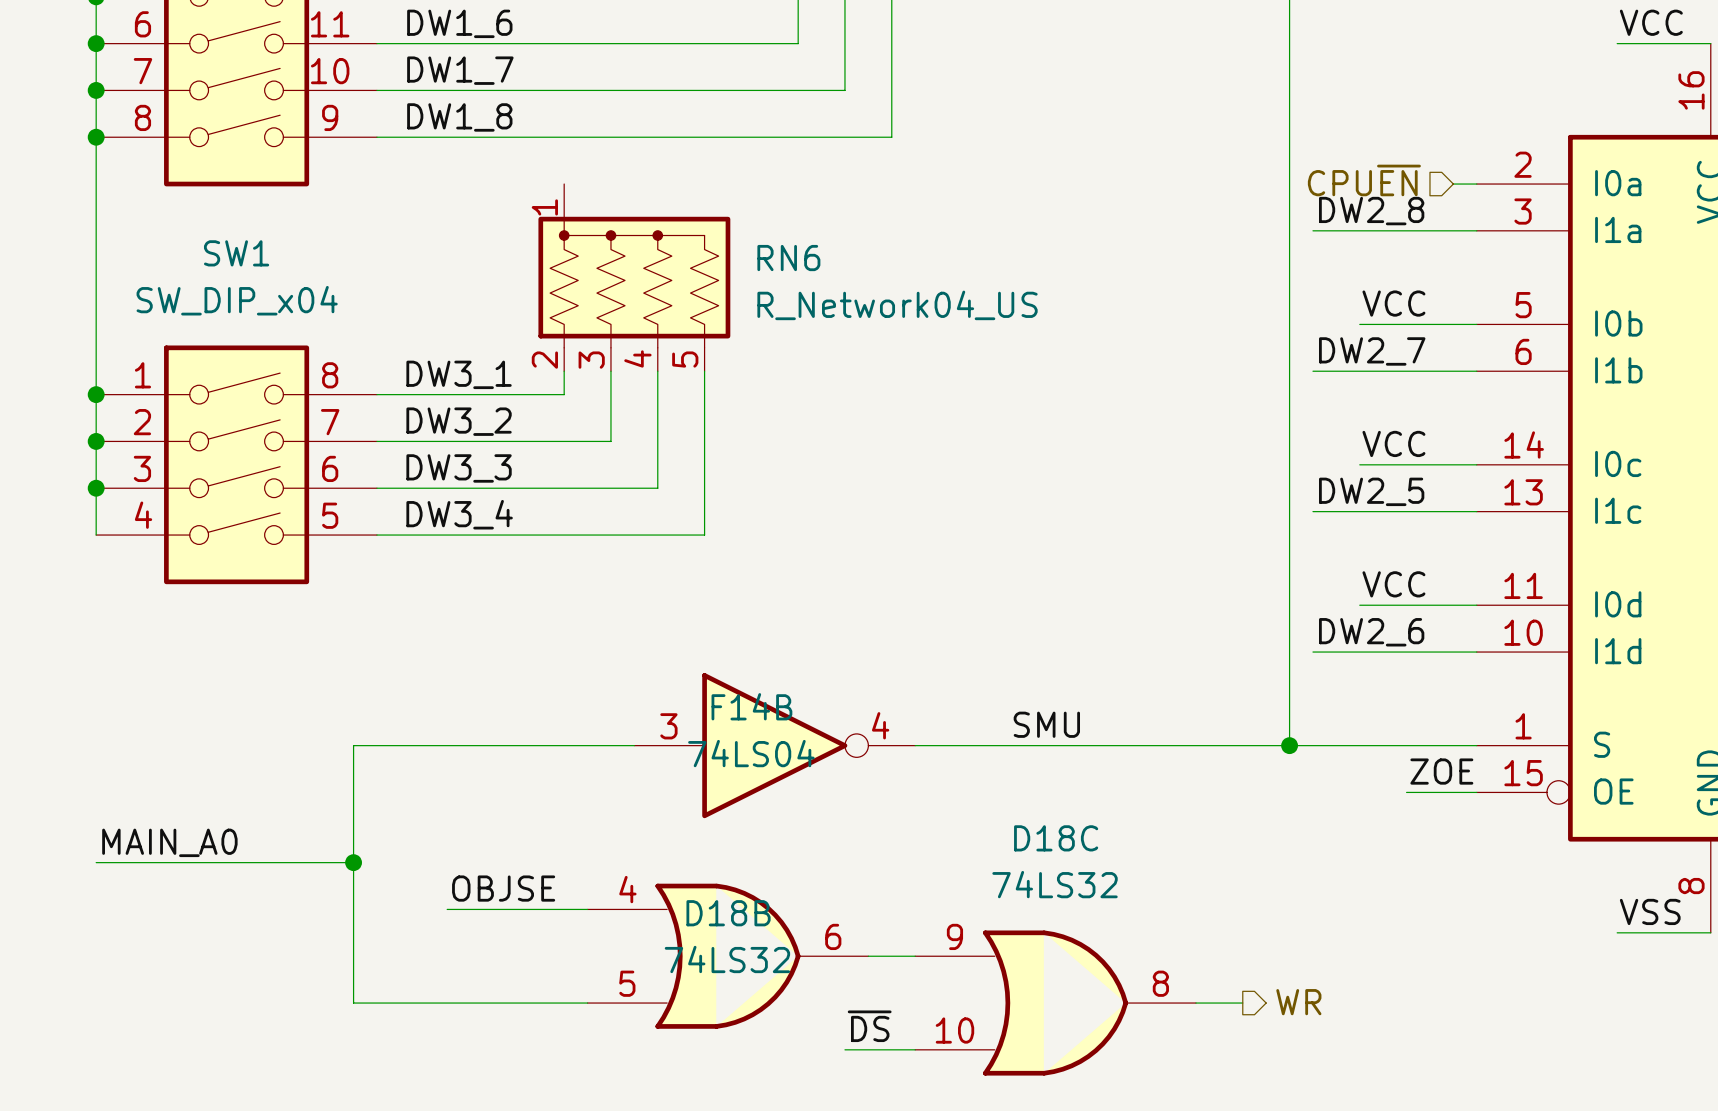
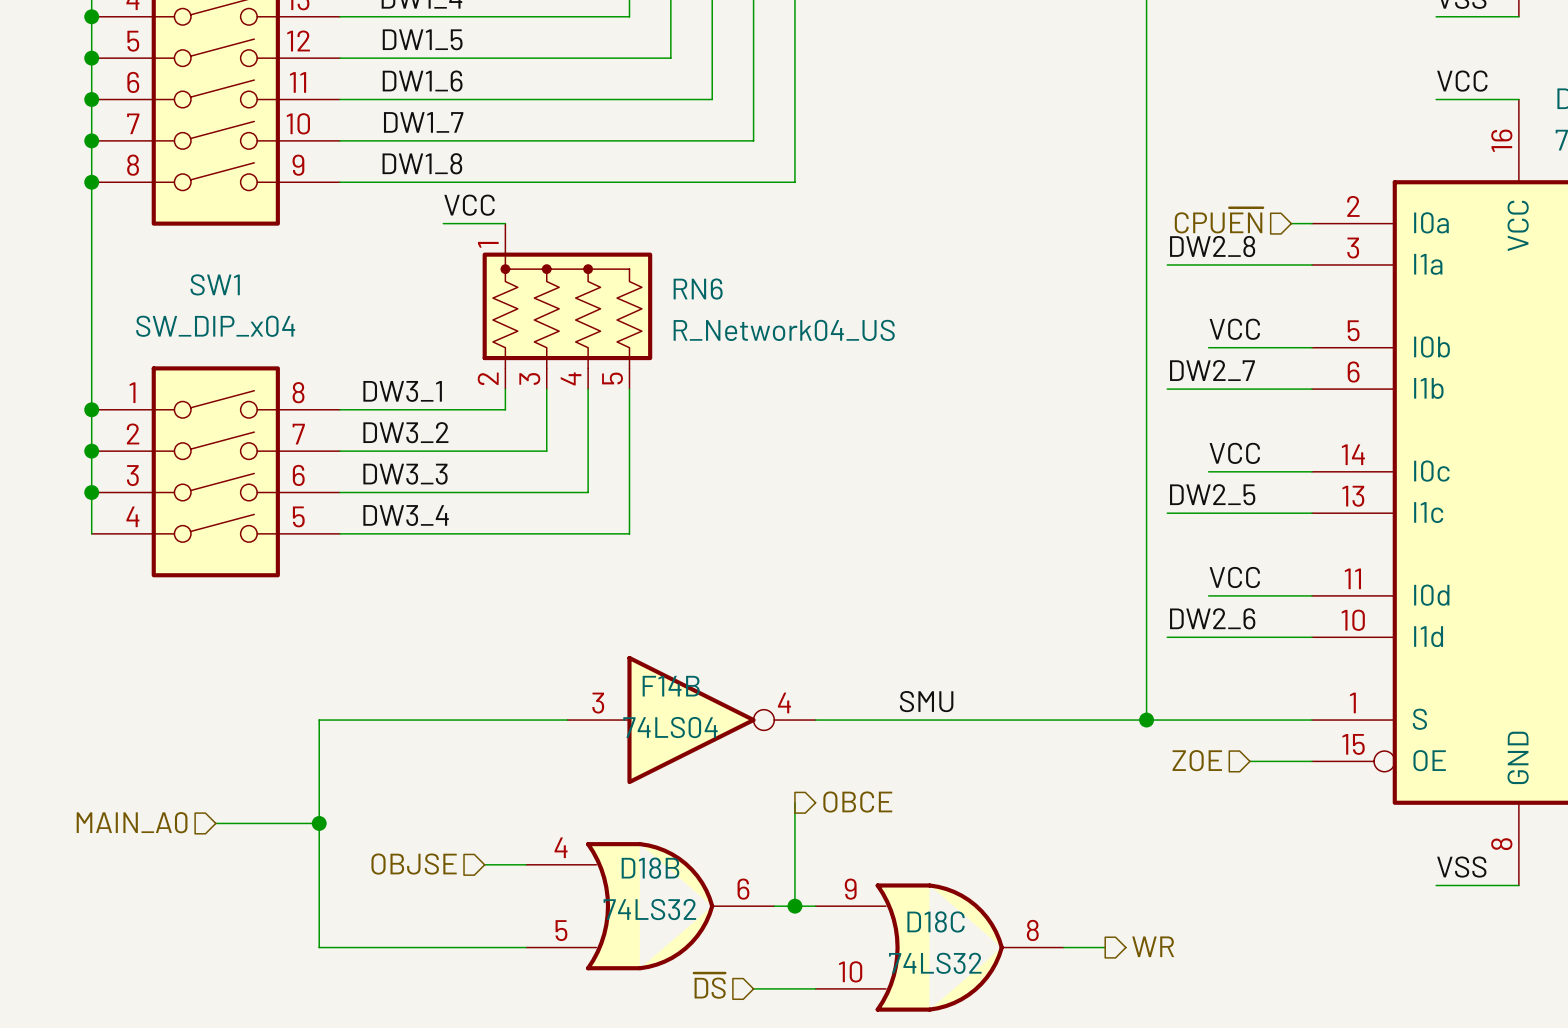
label: none -> VCC (469, 205)
wire: none -> (443, 223) (505, 223)
label: ZOE (1441, 771) -> none
hierarchical label: none -> ZOE (1197, 760)
hierarchical label: none -> OBCE (857, 802)
D18C name position: D18C (1056, 838) -> D18C (936, 921)
wire: none -> (794, 802) (794, 906)
label: MAIN_A0 (169, 842) -> none
wire: (96, 862) (236, 862) -> none
hierarchical label: none -> MAIN_A0 (132, 822)
D18C value position: 74LS32 (1055, 884) -> 74LS32 (935, 963)
label: OBJSE (503, 888) -> none
hierarchical label: none -> OBJSE (414, 864)
wire: (447, 909) (540, 909) -> none
junction: none -> (794, 906)
label: ~{DS} (869, 1026) -> none
hierarchical label: none -> ~{DS} (709, 985)

